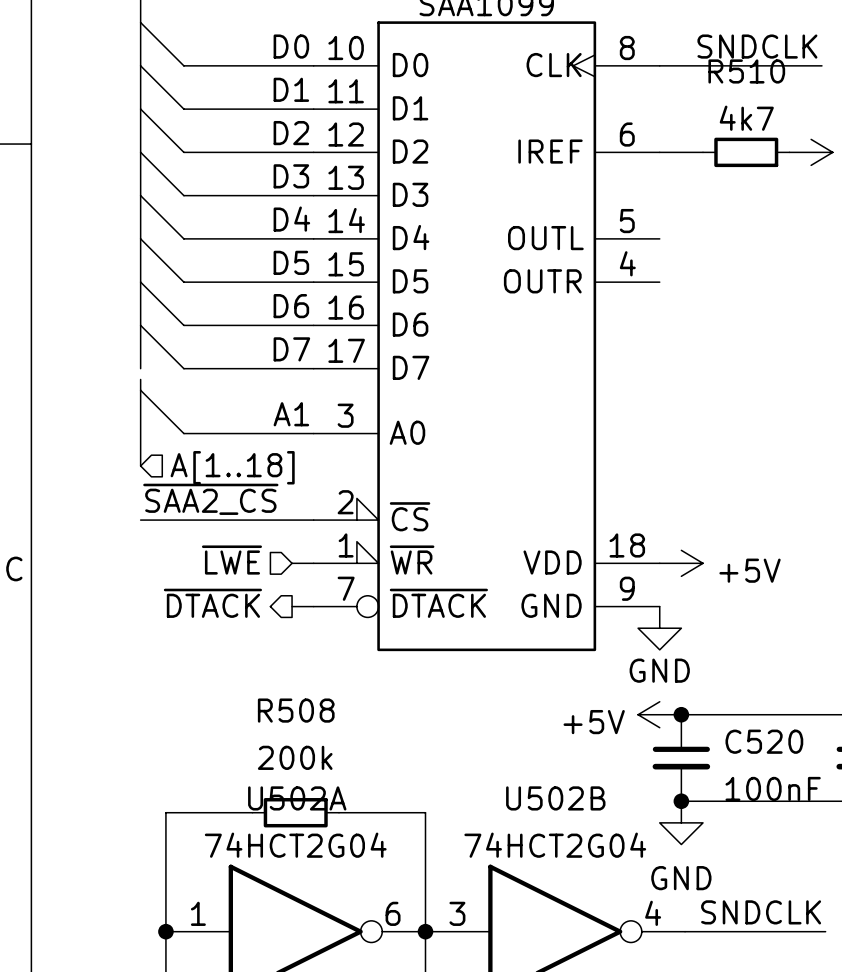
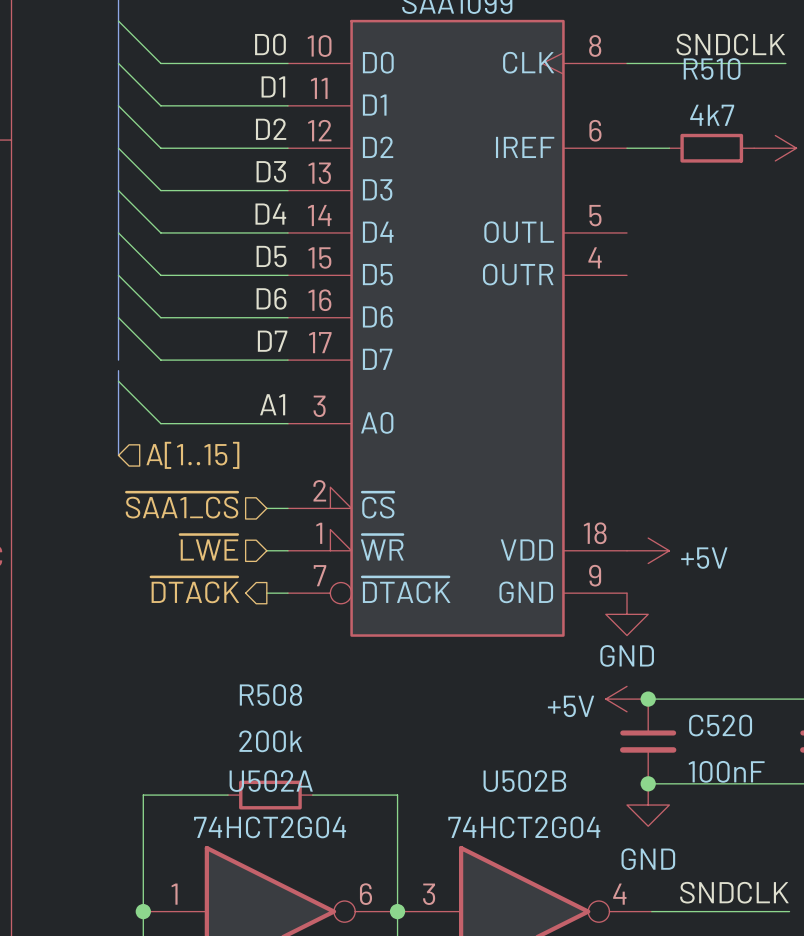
hierarchical label: A[1..18] (232, 467) -> A[1..15] (192, 455)
label: ~{SAA2_CS} (210, 499) -> none
hierarchical label: none -> ~{SAA1_CS} (182, 505)
wire: (140, 520) (292, 520) -> none

